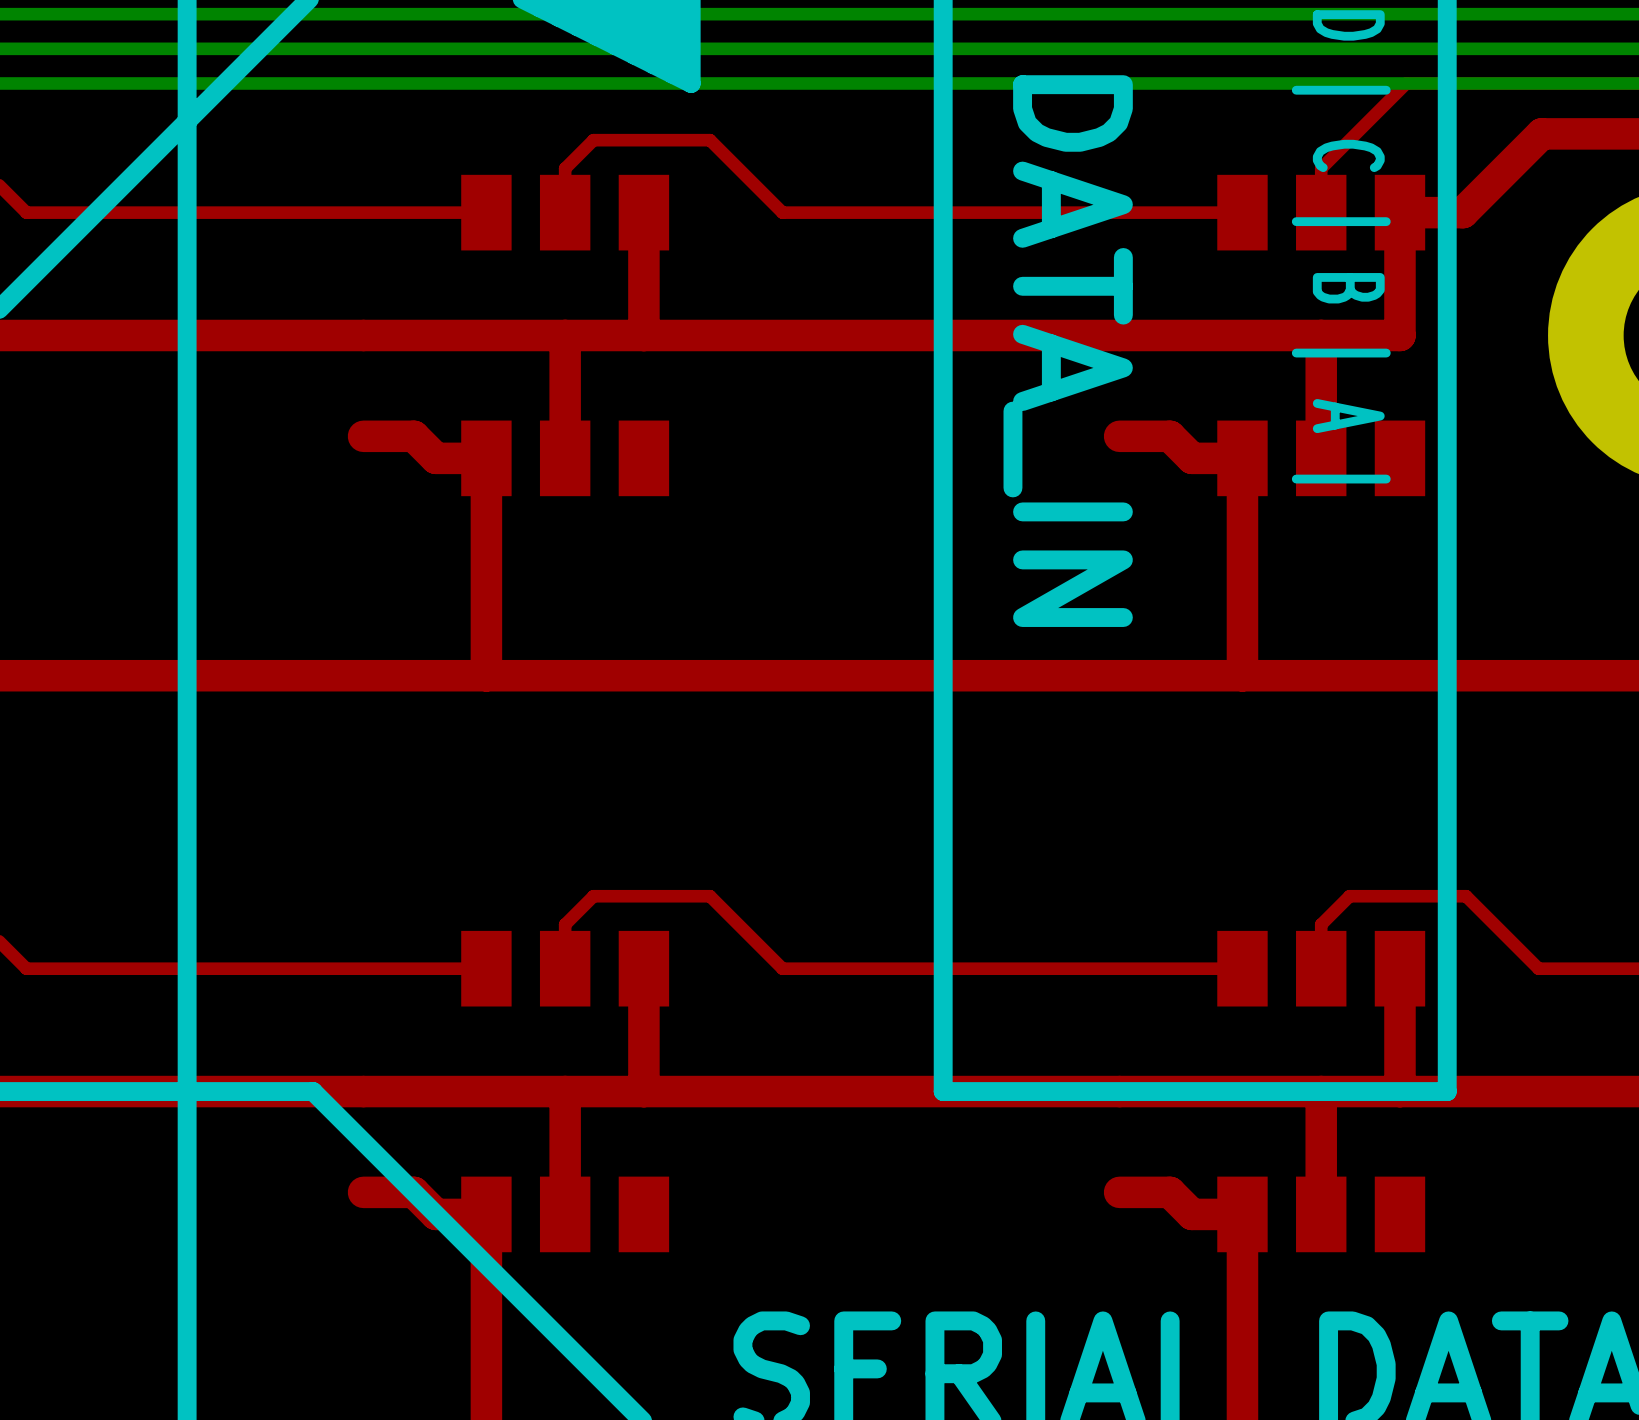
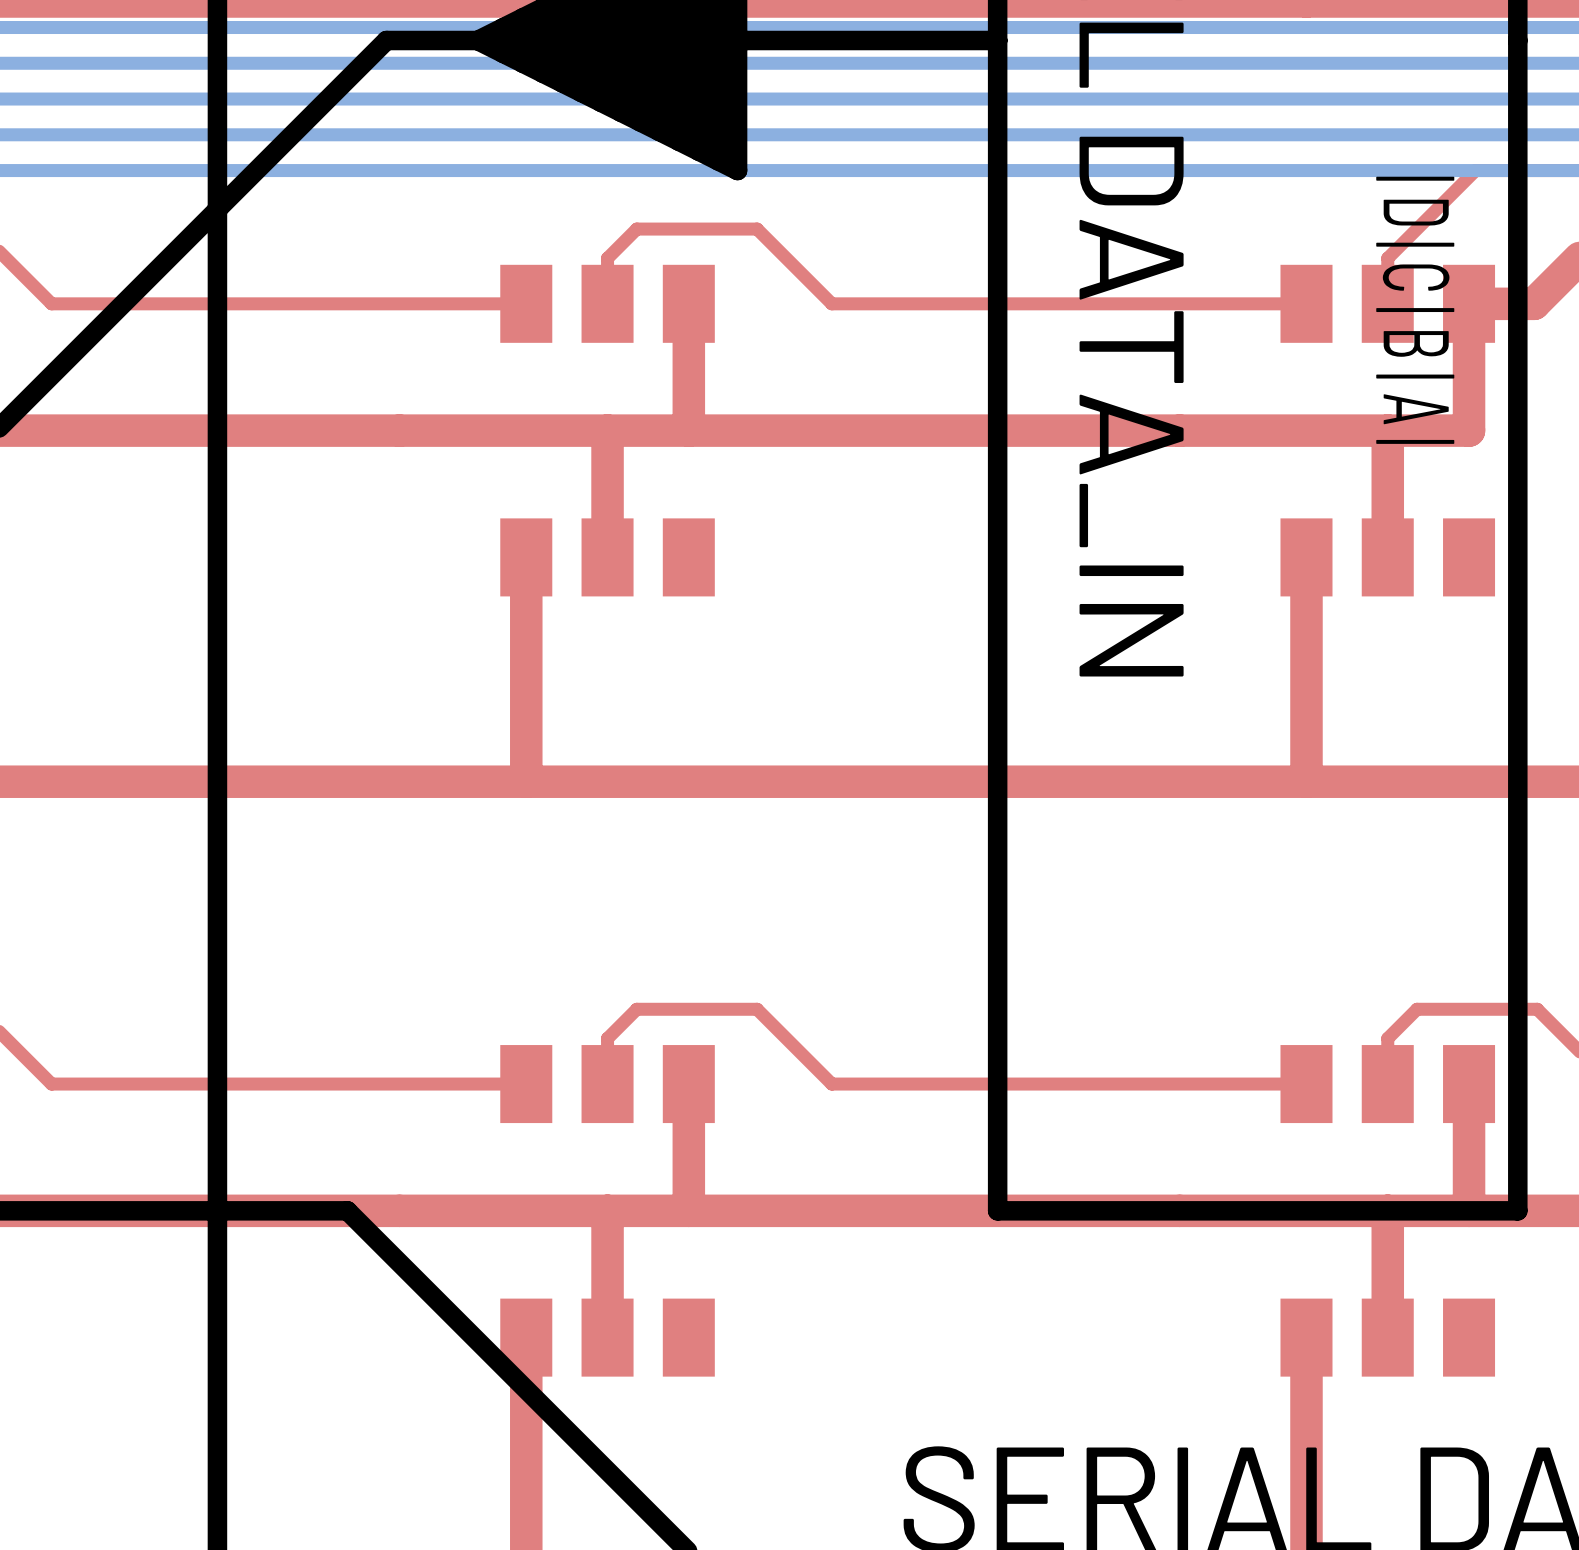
top track: (363, 436) (413, 436) (436, 458) (486, 458) -> none
top track: (1119, 436) (1170, 436) (1192, 458) (1242, 458) -> none
top track: (363, 1192) (413, 1192) (436, 1214) (486, 1214) -> none
top track: (1119, 1192) (1170, 1192) (1192, 1214) (1242, 1214) -> none

